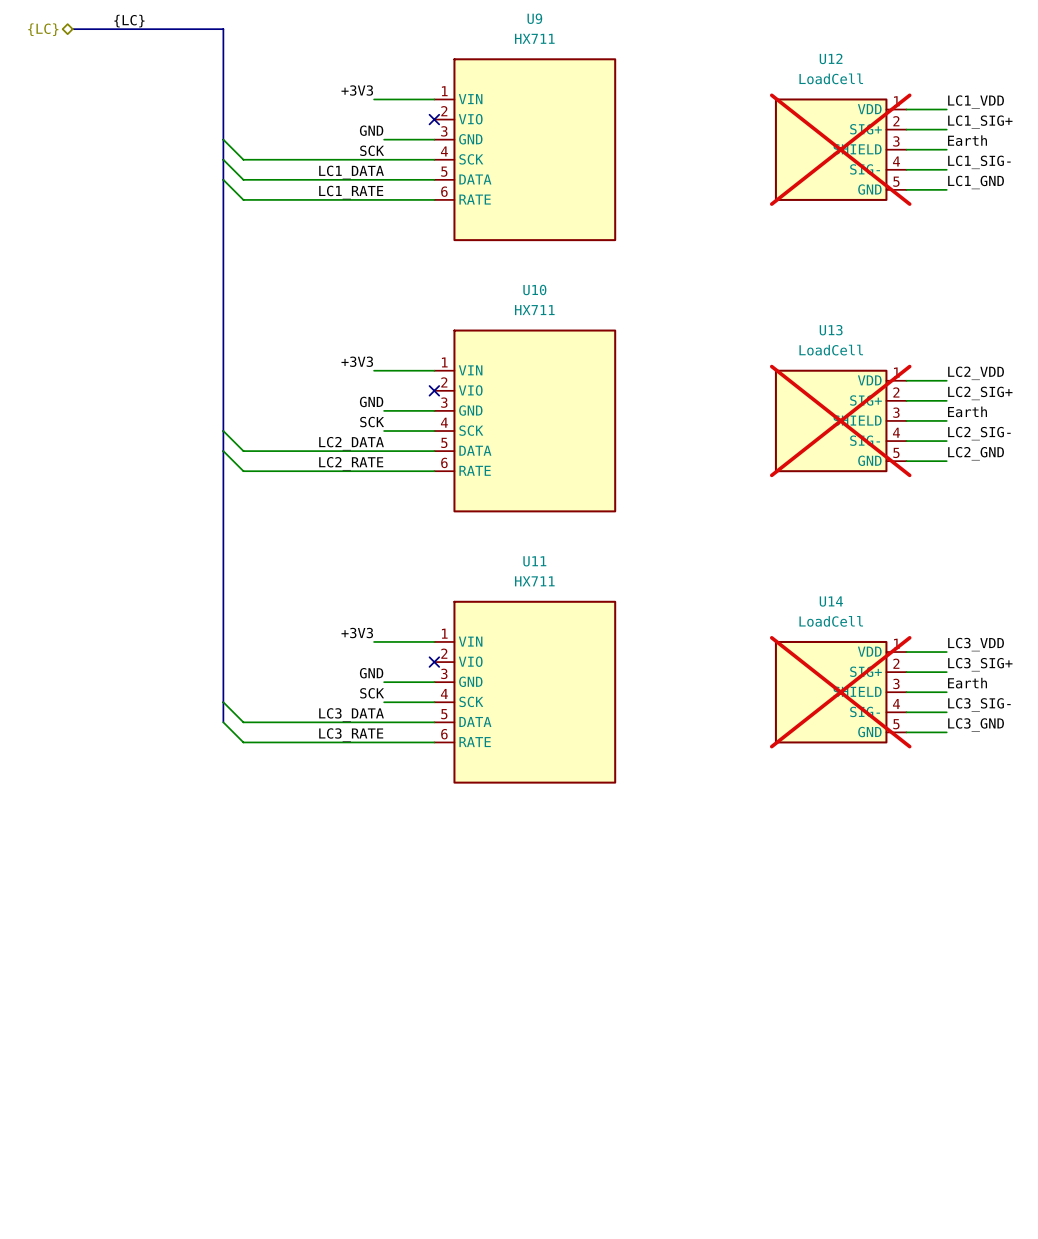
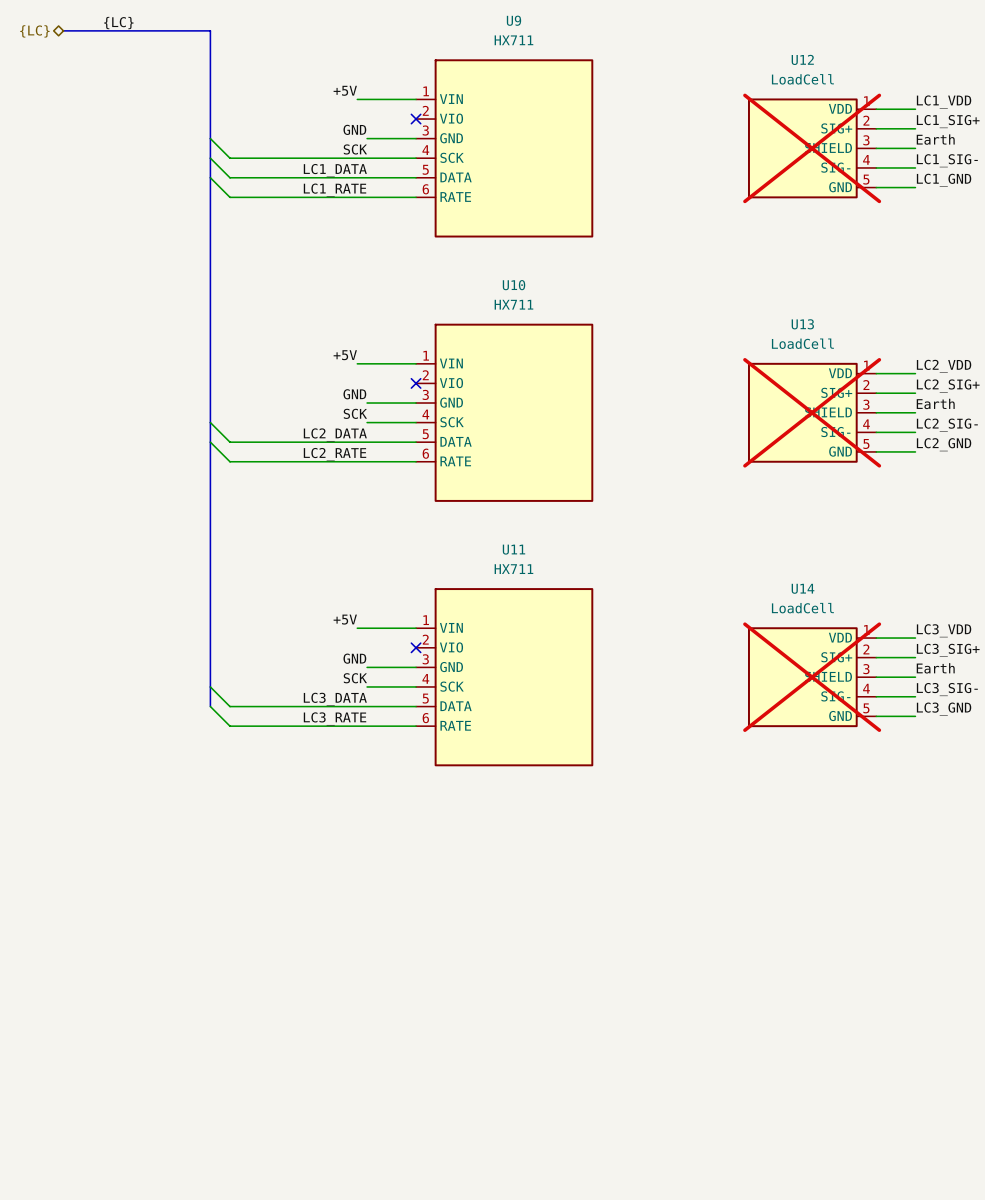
label: +3V3 (357, 90) -> +5V (345, 90)
label: +3V3 (357, 361) -> +5V (345, 355)
label: +3V3 (357, 633) -> +5V (345, 619)

